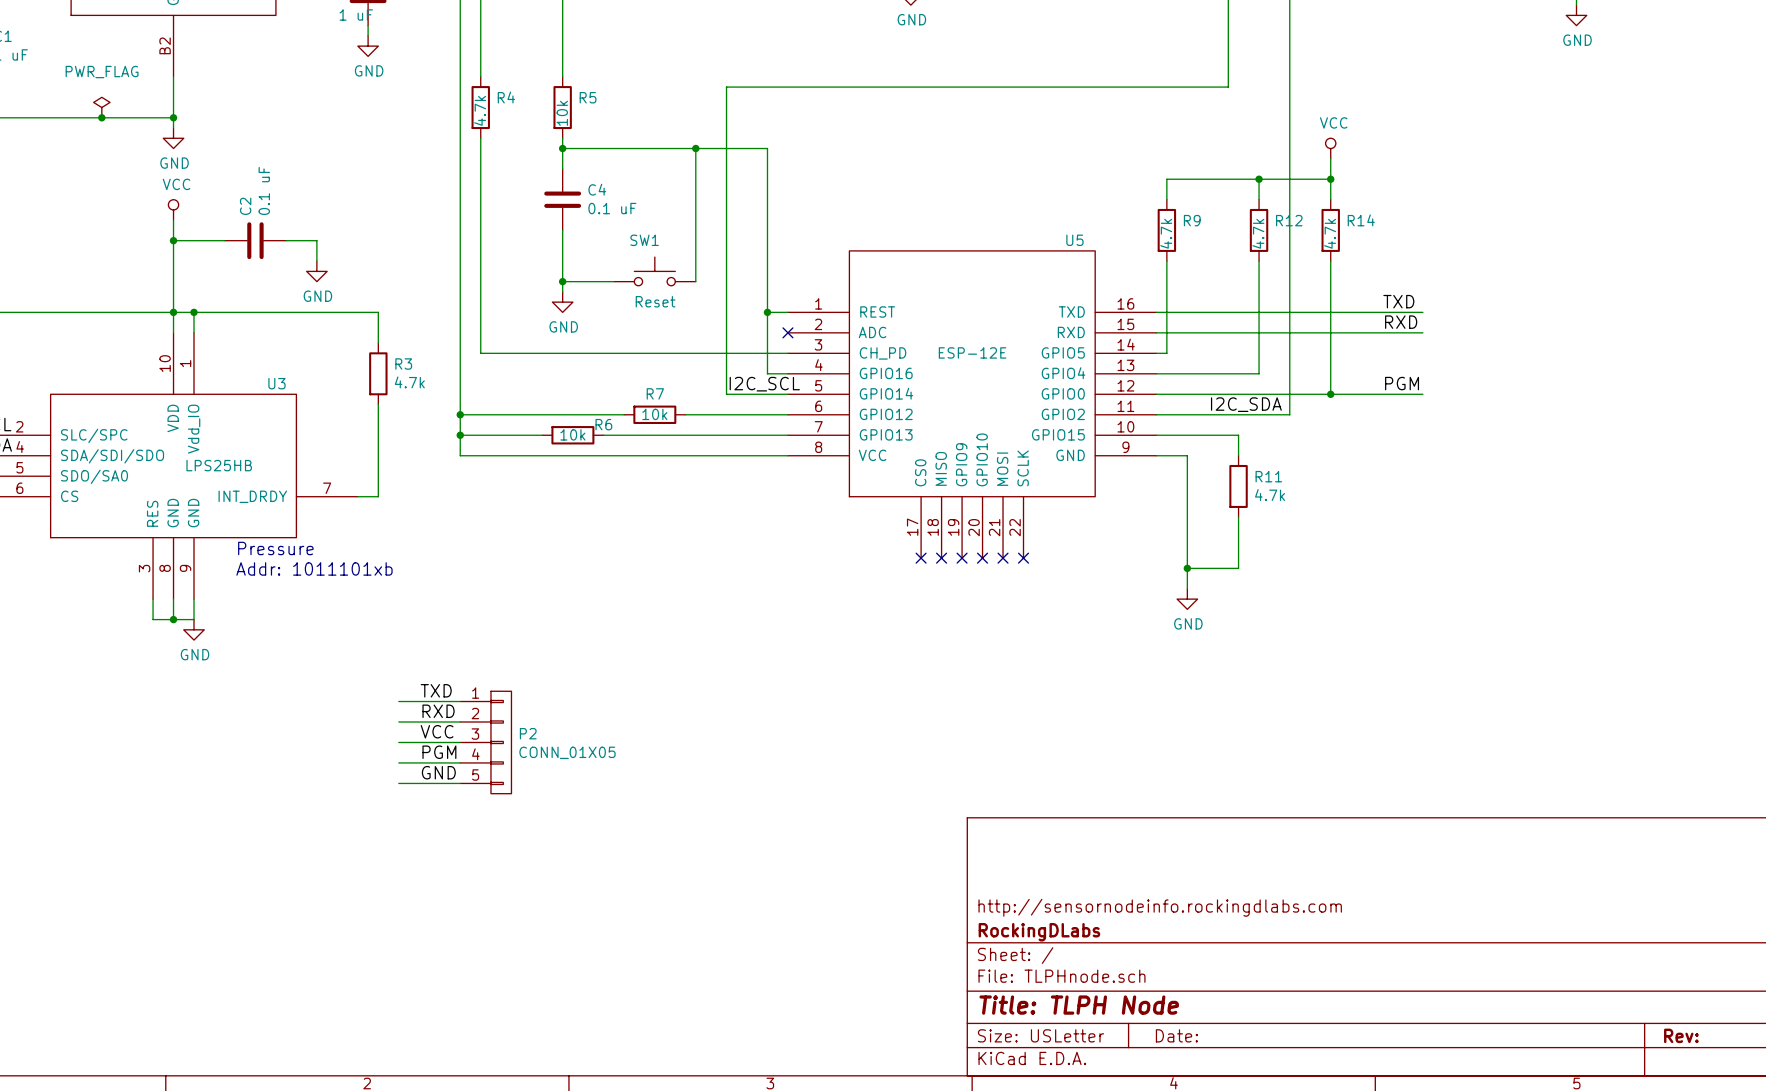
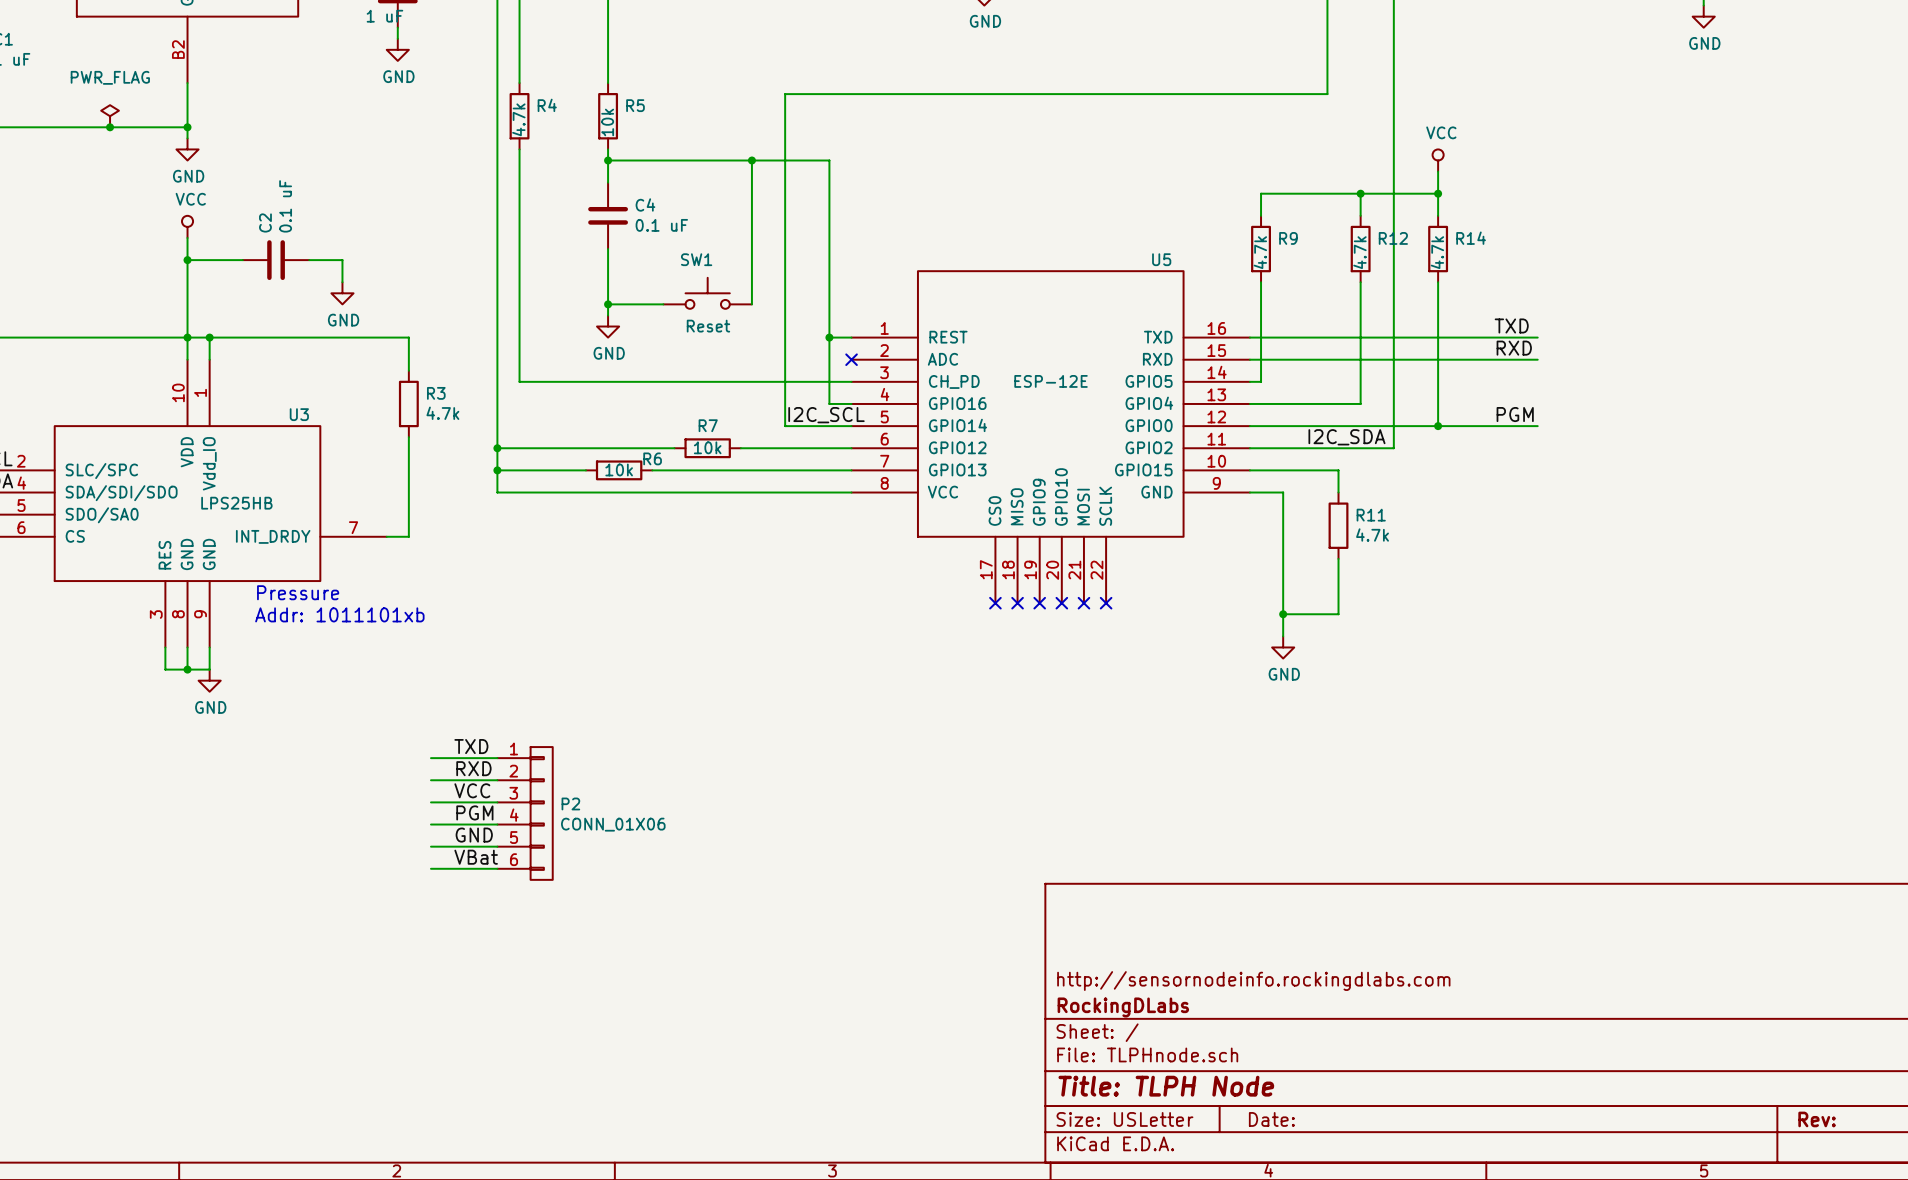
P2 symbol: [460, 691, 512, 794] -> [497, 747, 553, 880]
P2 value: CONN_01X05 (567, 752) -> CONN_01X06 (613, 824)
label: none -> VBat (476, 857)
wire: none -> (431, 868) (497, 868)

